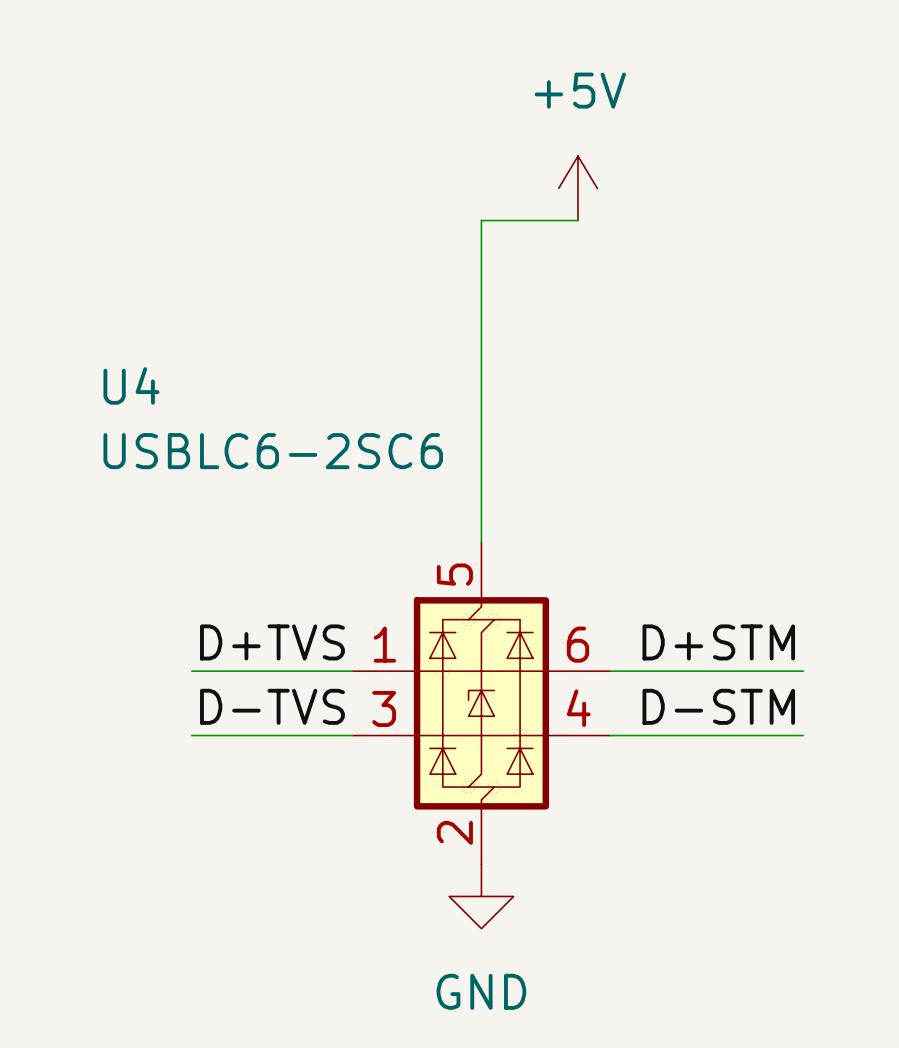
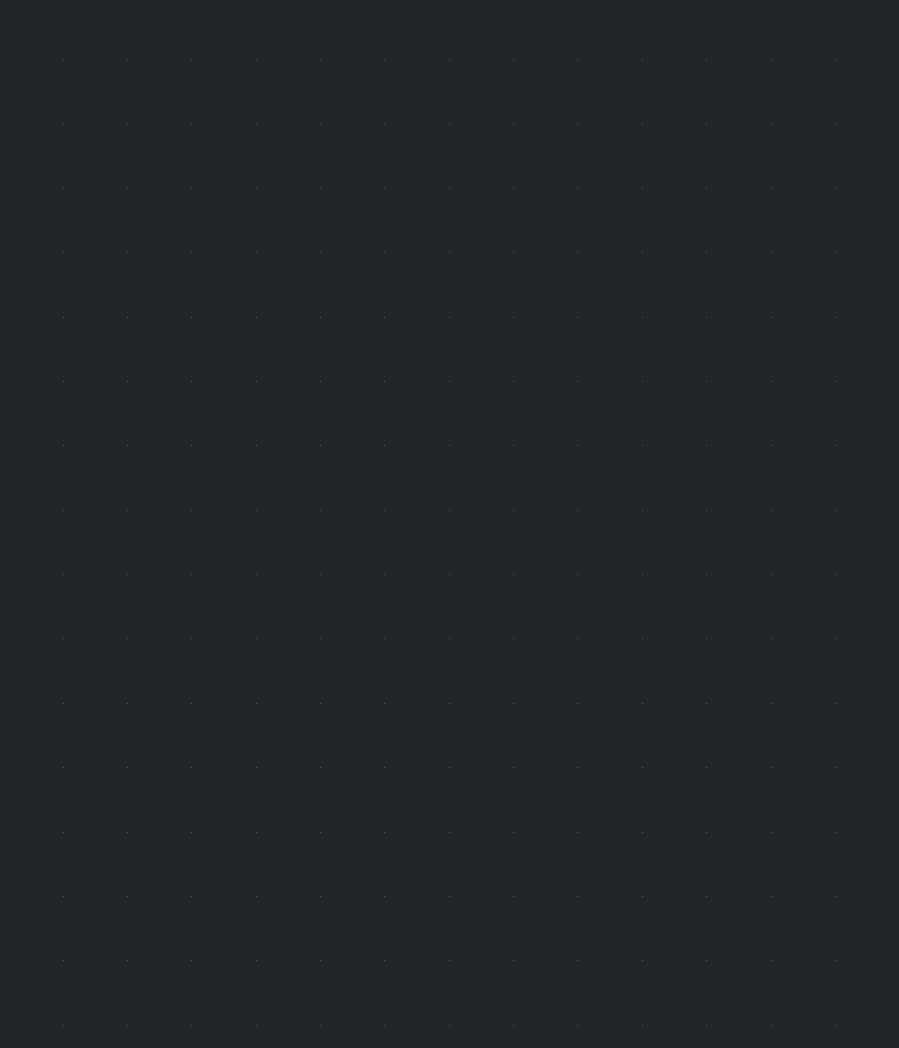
power symbol: +5V (577, 188) -> none
wire: (577, 220) (481, 220) (481, 542) -> none
label: D+TVS (272, 642) -> none
label: D+STM (718, 642) -> none
wire: (191, 671) (352, 671) -> none
wire: (610, 671) (803, 671) -> none
U4: USBLC6-2SC6 (481, 703) -> none
label: D-TVS (272, 706) -> none
label: D-STM (718, 706) -> none
wire: (191, 735) (352, 735) -> none
wire: (610, 735) (803, 735) -> none
power symbol: GND (481, 896) -> none

